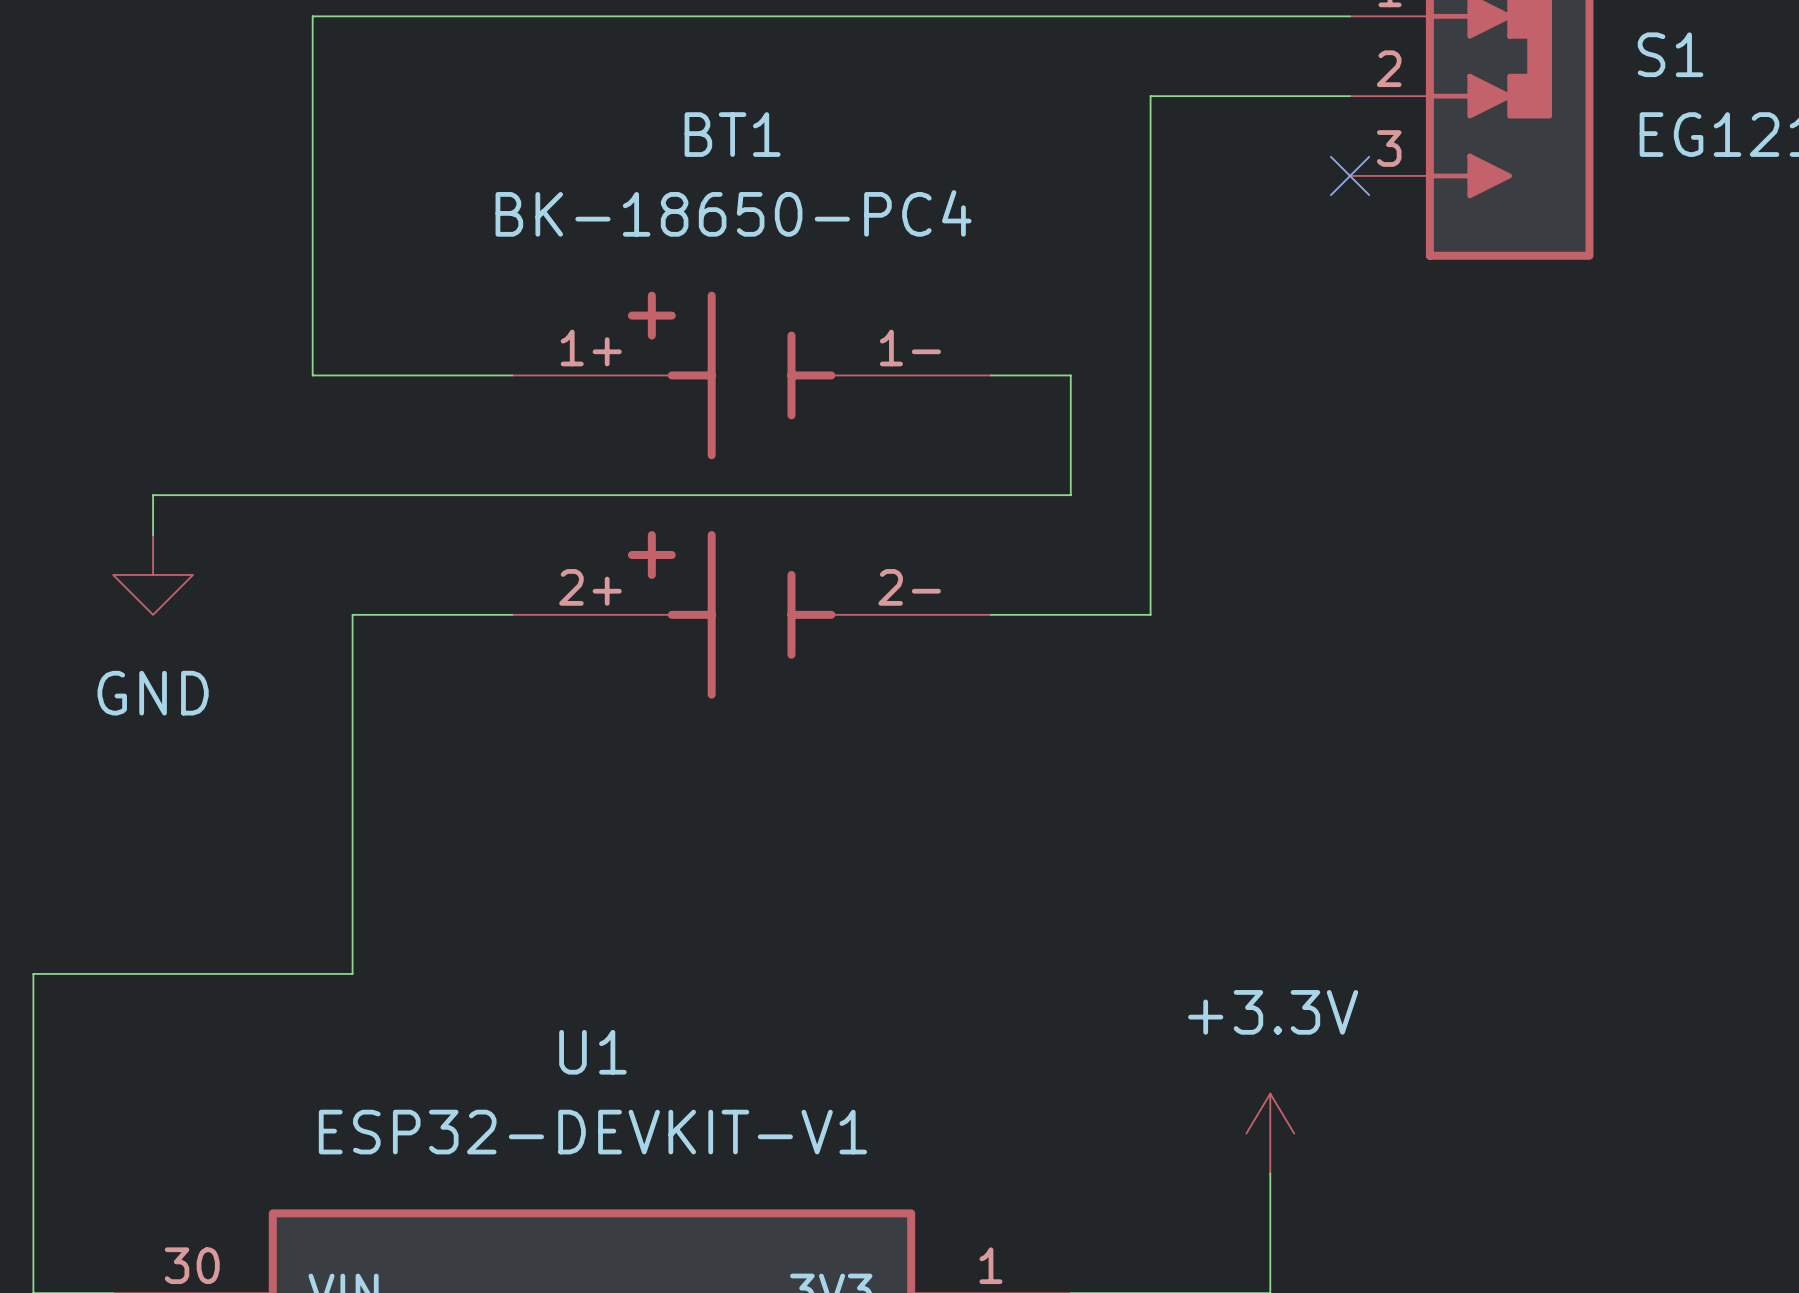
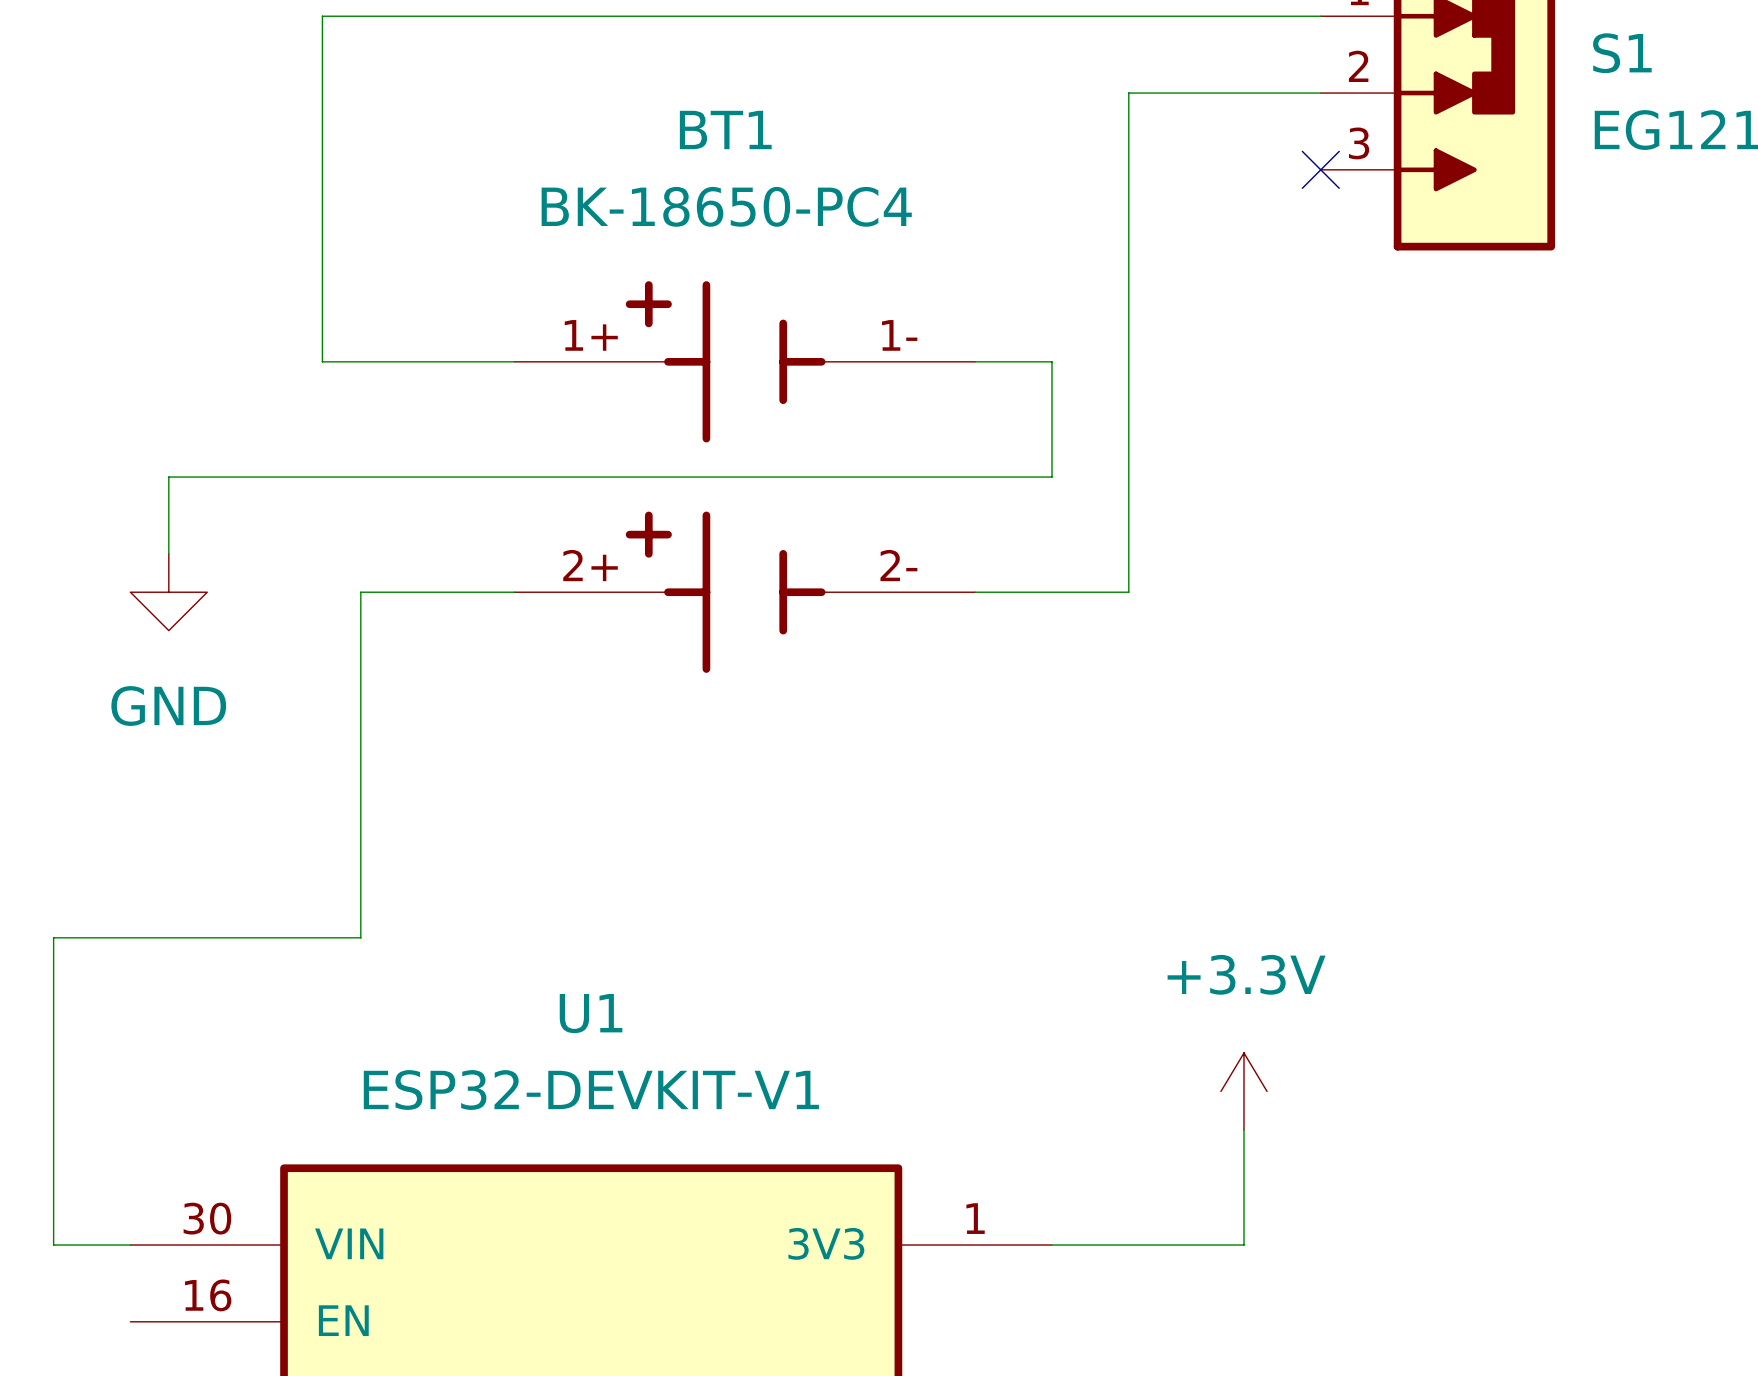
power symbol position: GND (153, 574) -> GND (168, 592)

